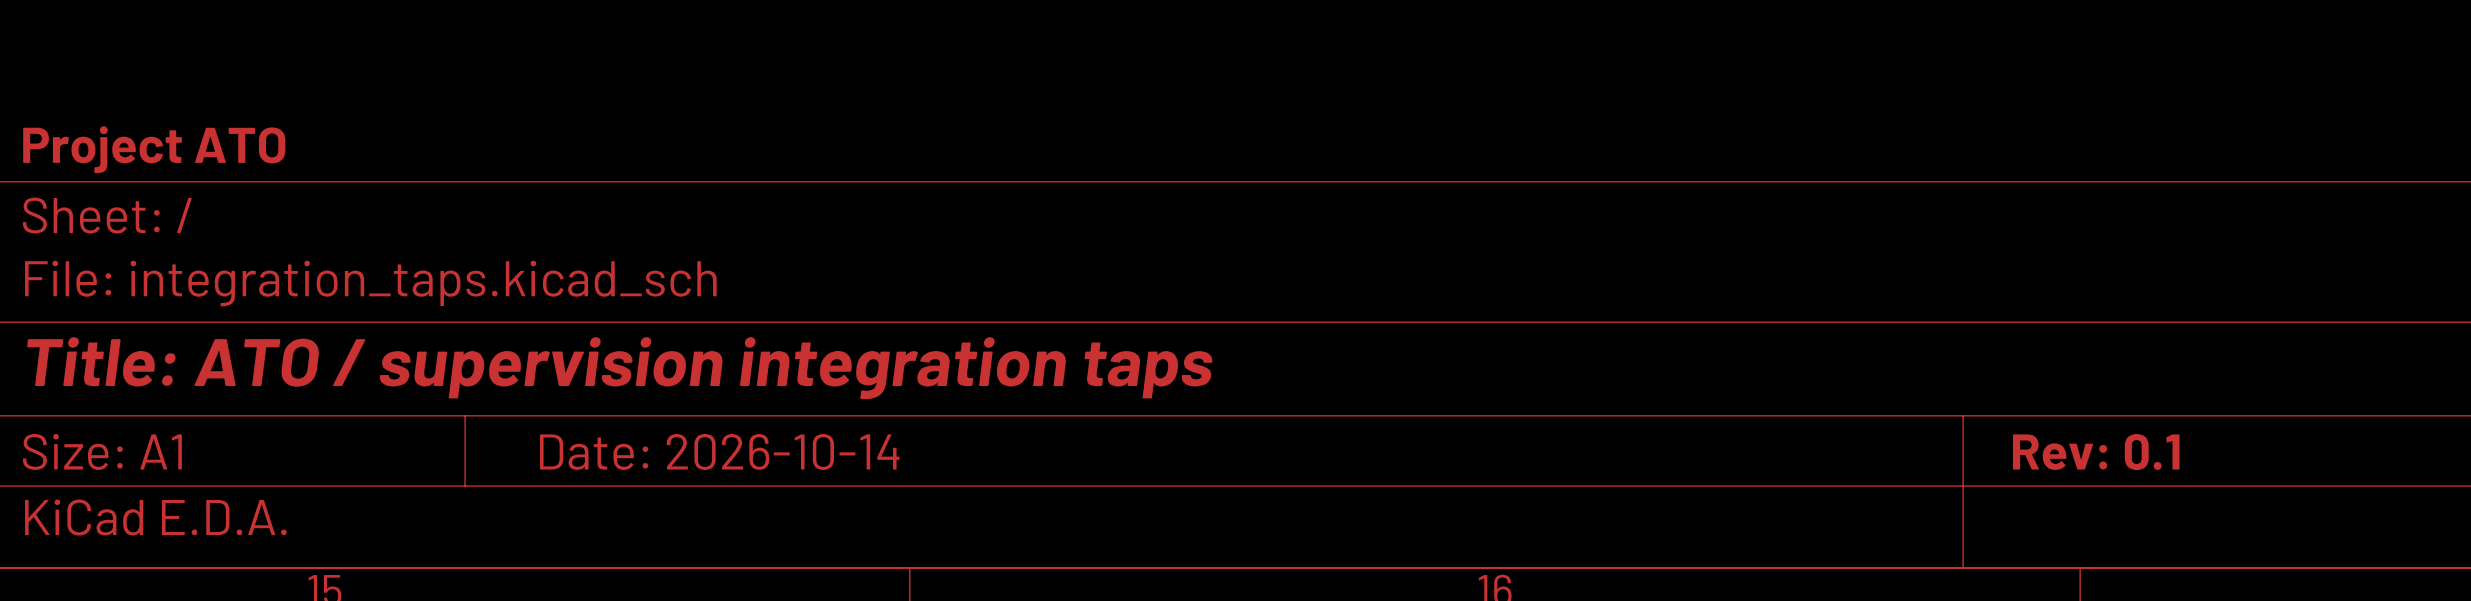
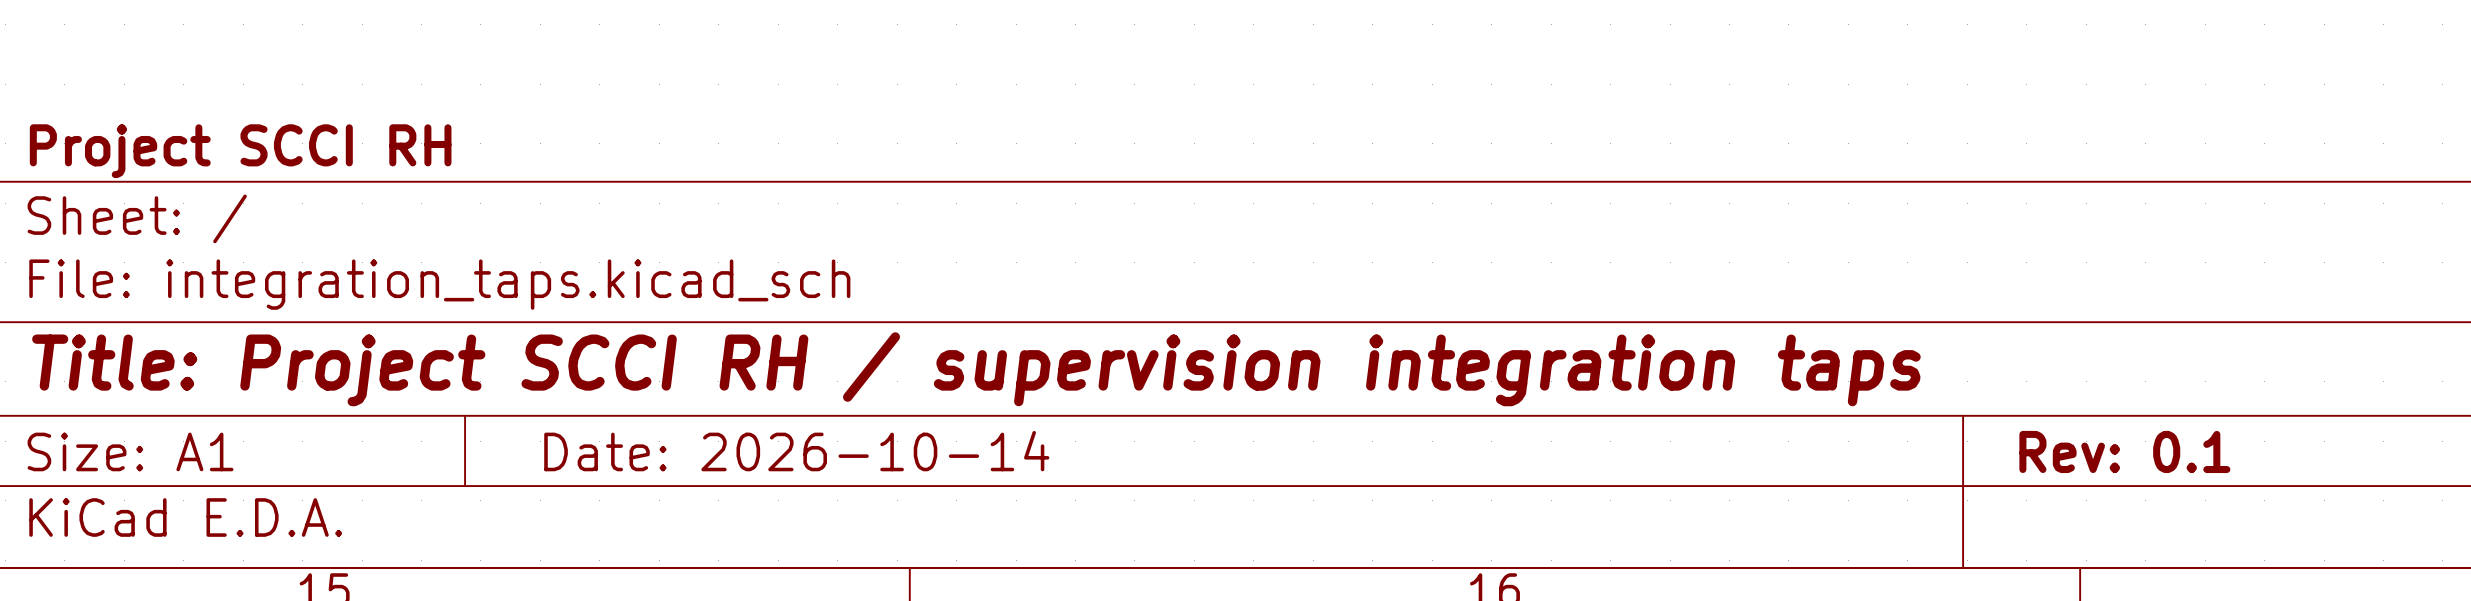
title block: Project ATO (154, 149) -> Project SCCI RH (240, 151)
title block: Title: ATO / supervision integration taps (619, 368) -> Title: Project SCCI RH / supervision integration taps (976, 369)

